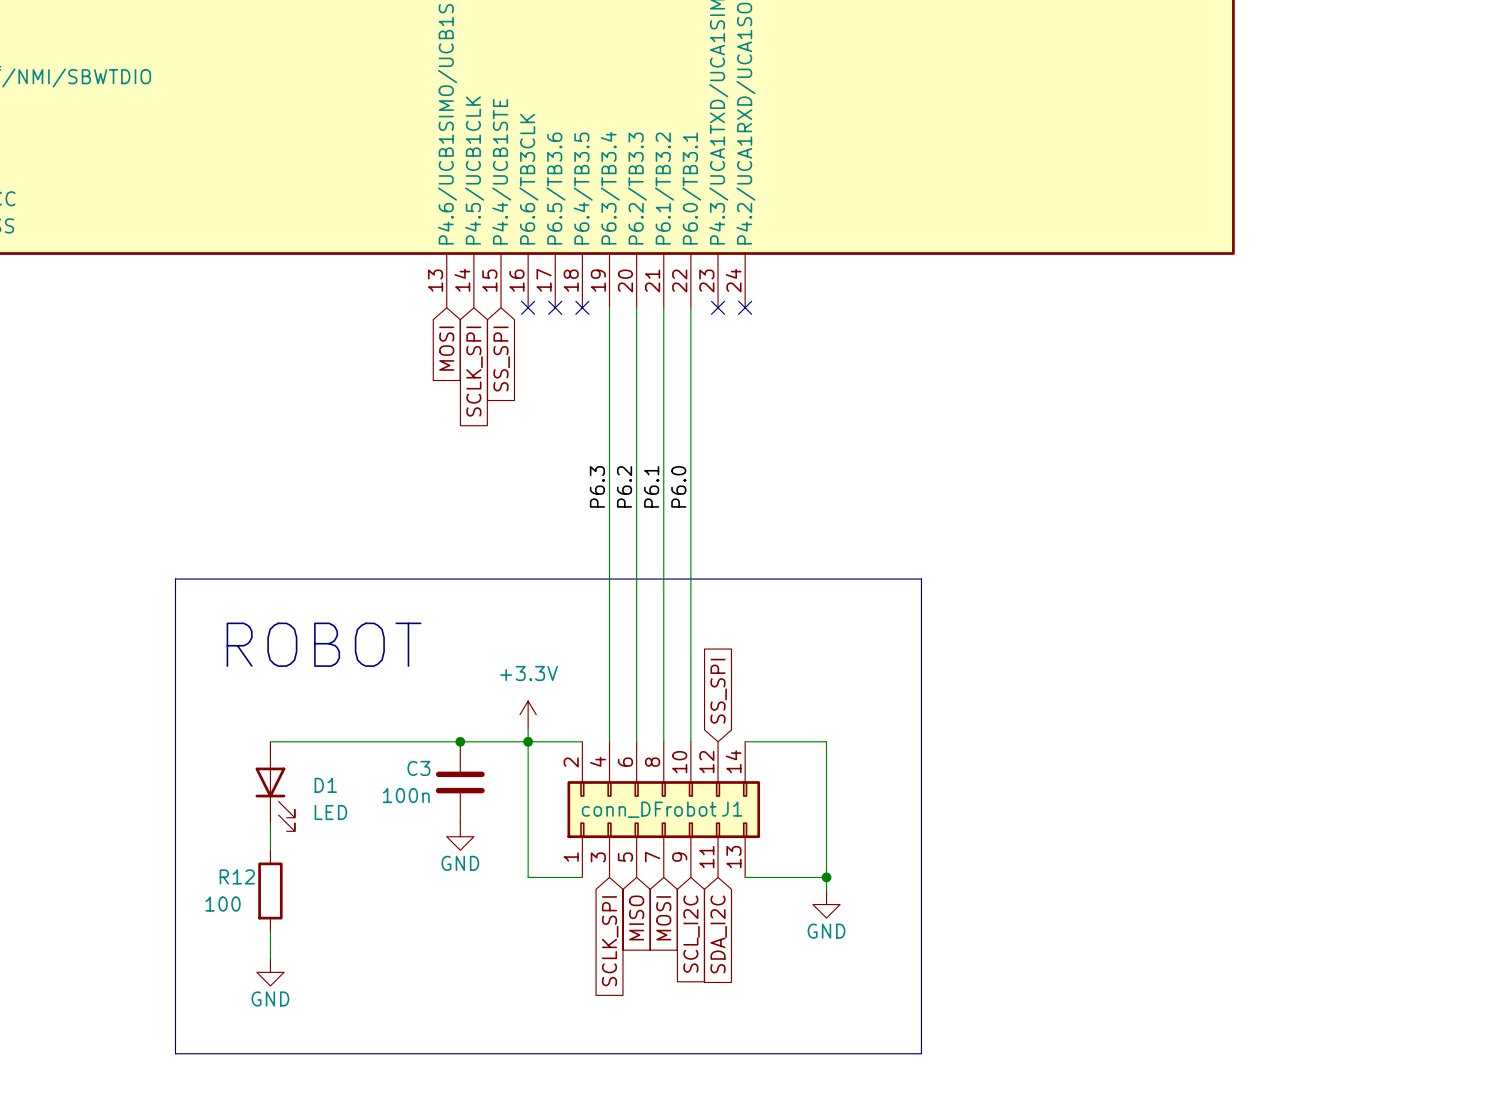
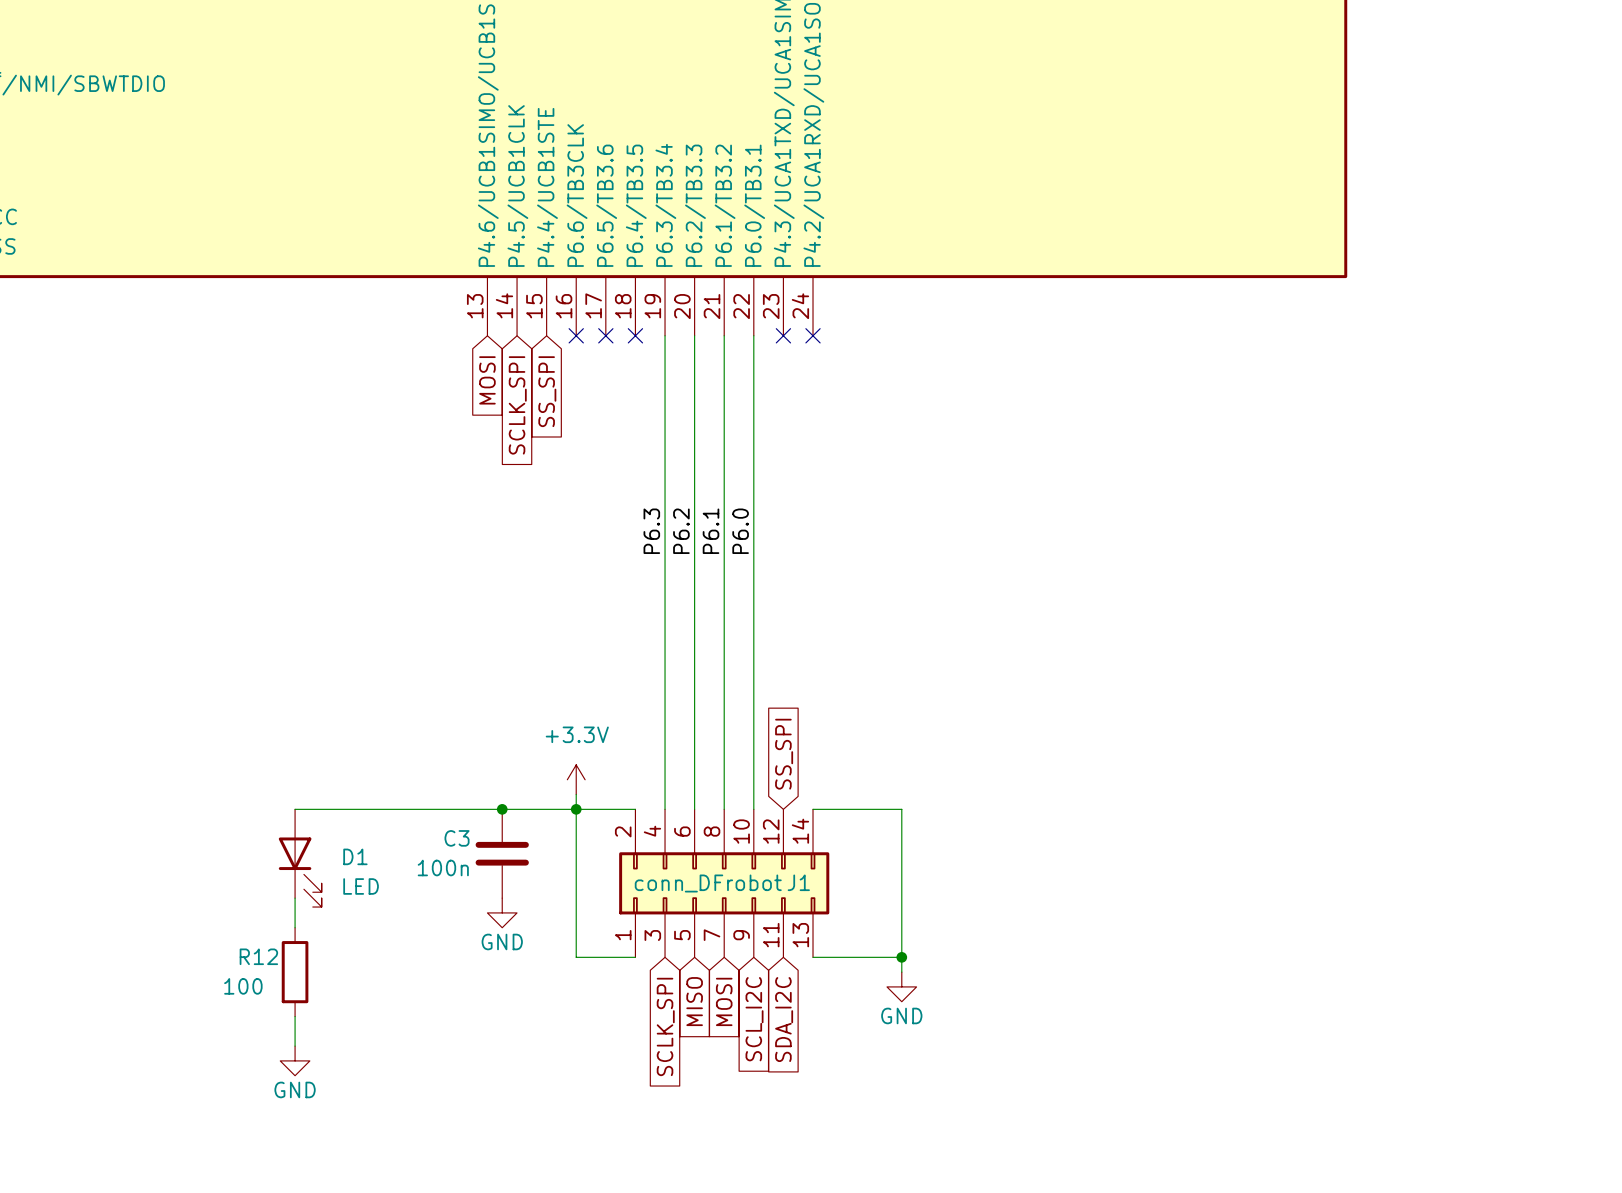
line: (175, 579) (921, 579) (921, 1053) (175, 1053) (175, 579) -> none
text: ROBOT (324, 644) -> none

